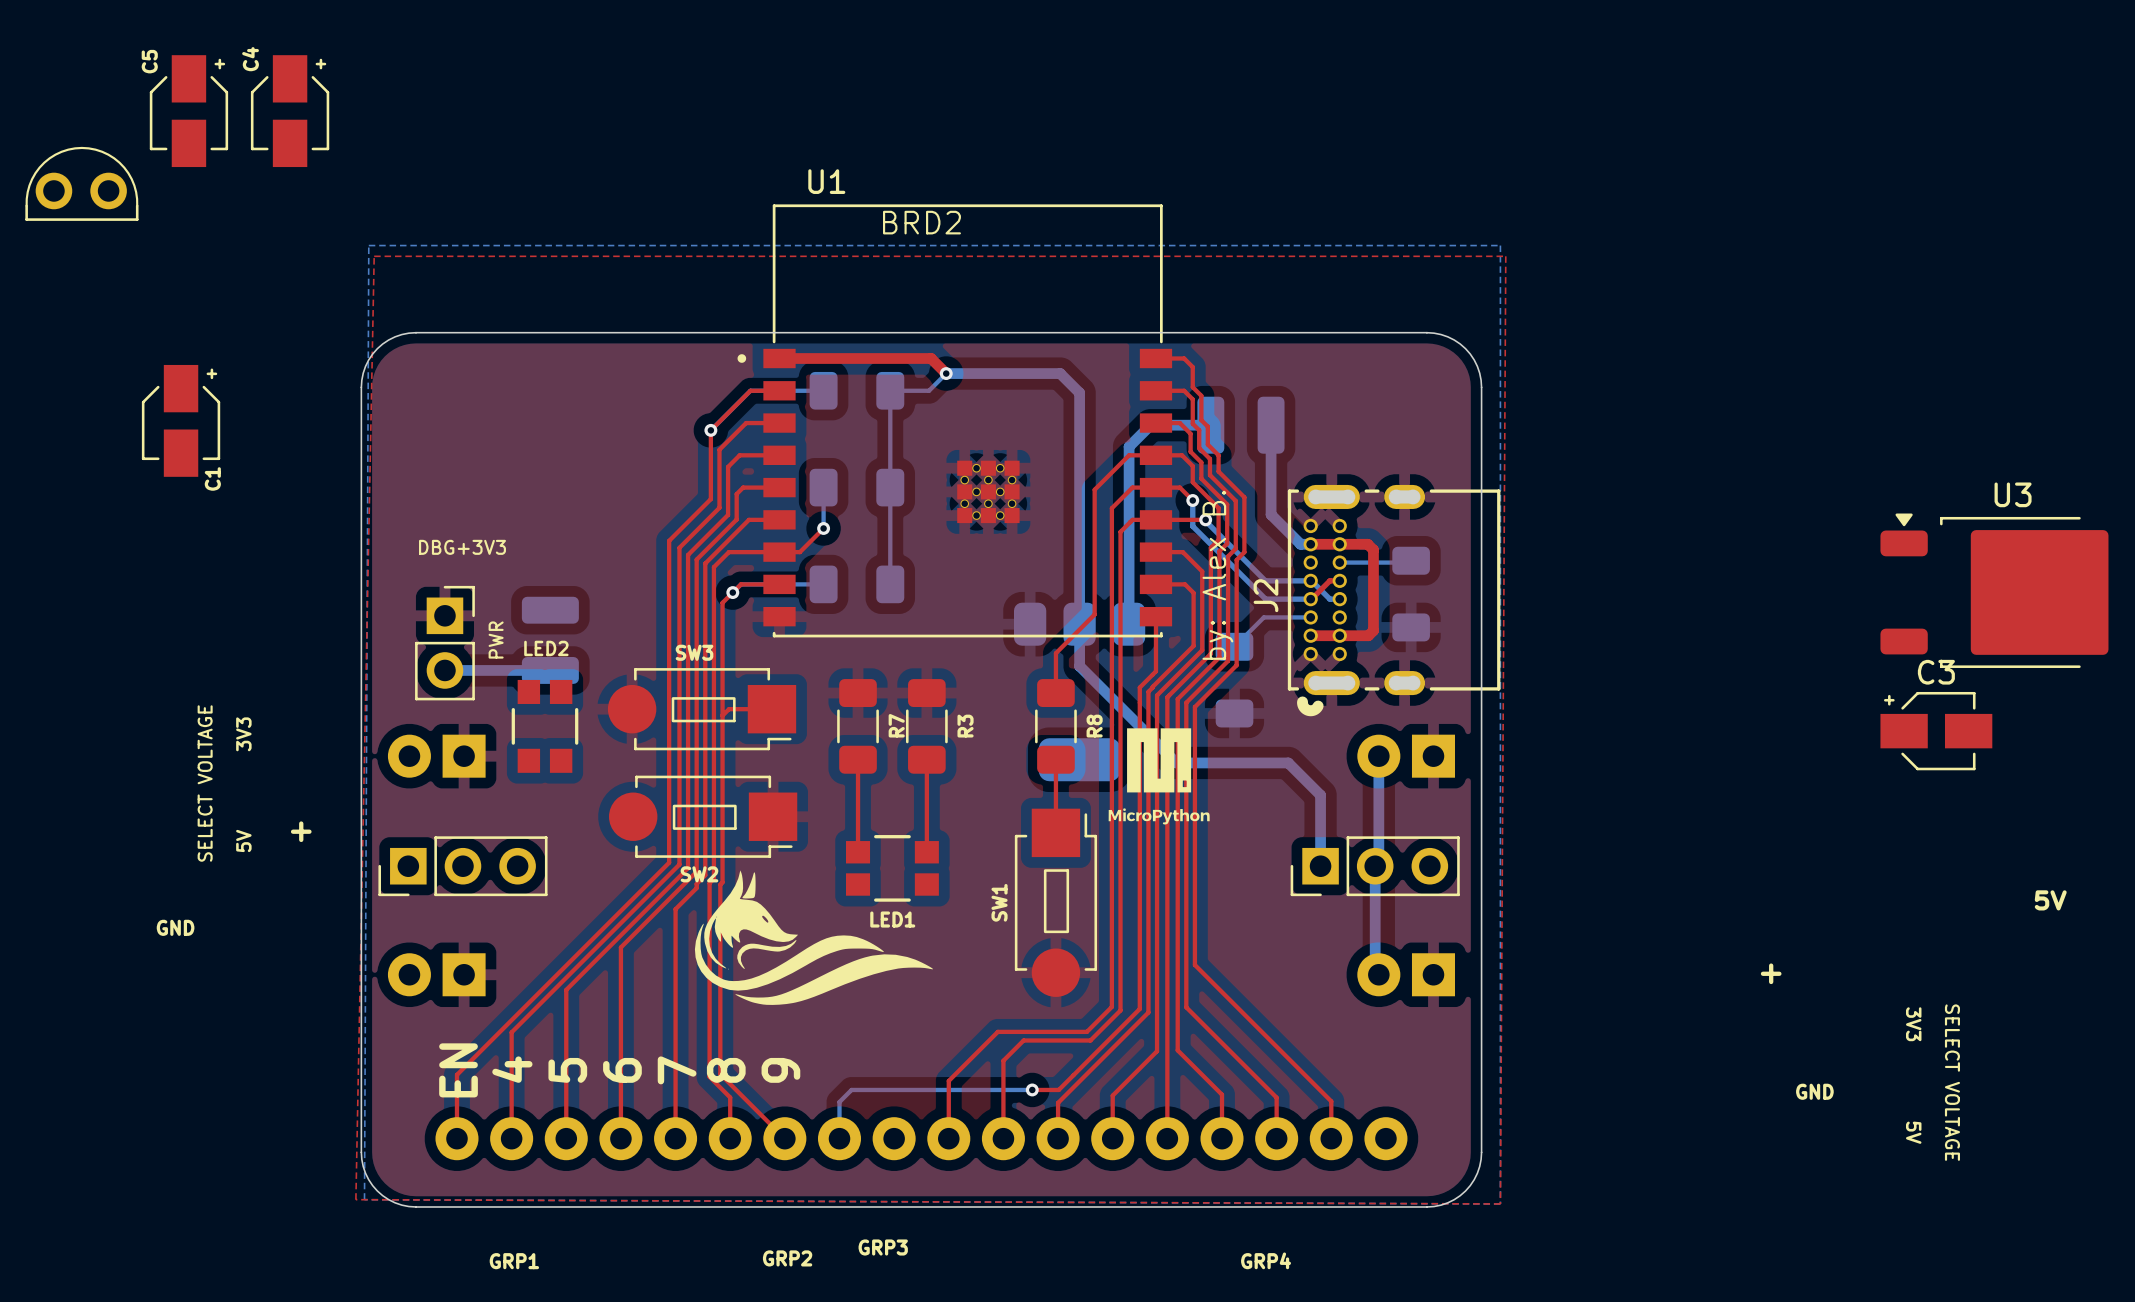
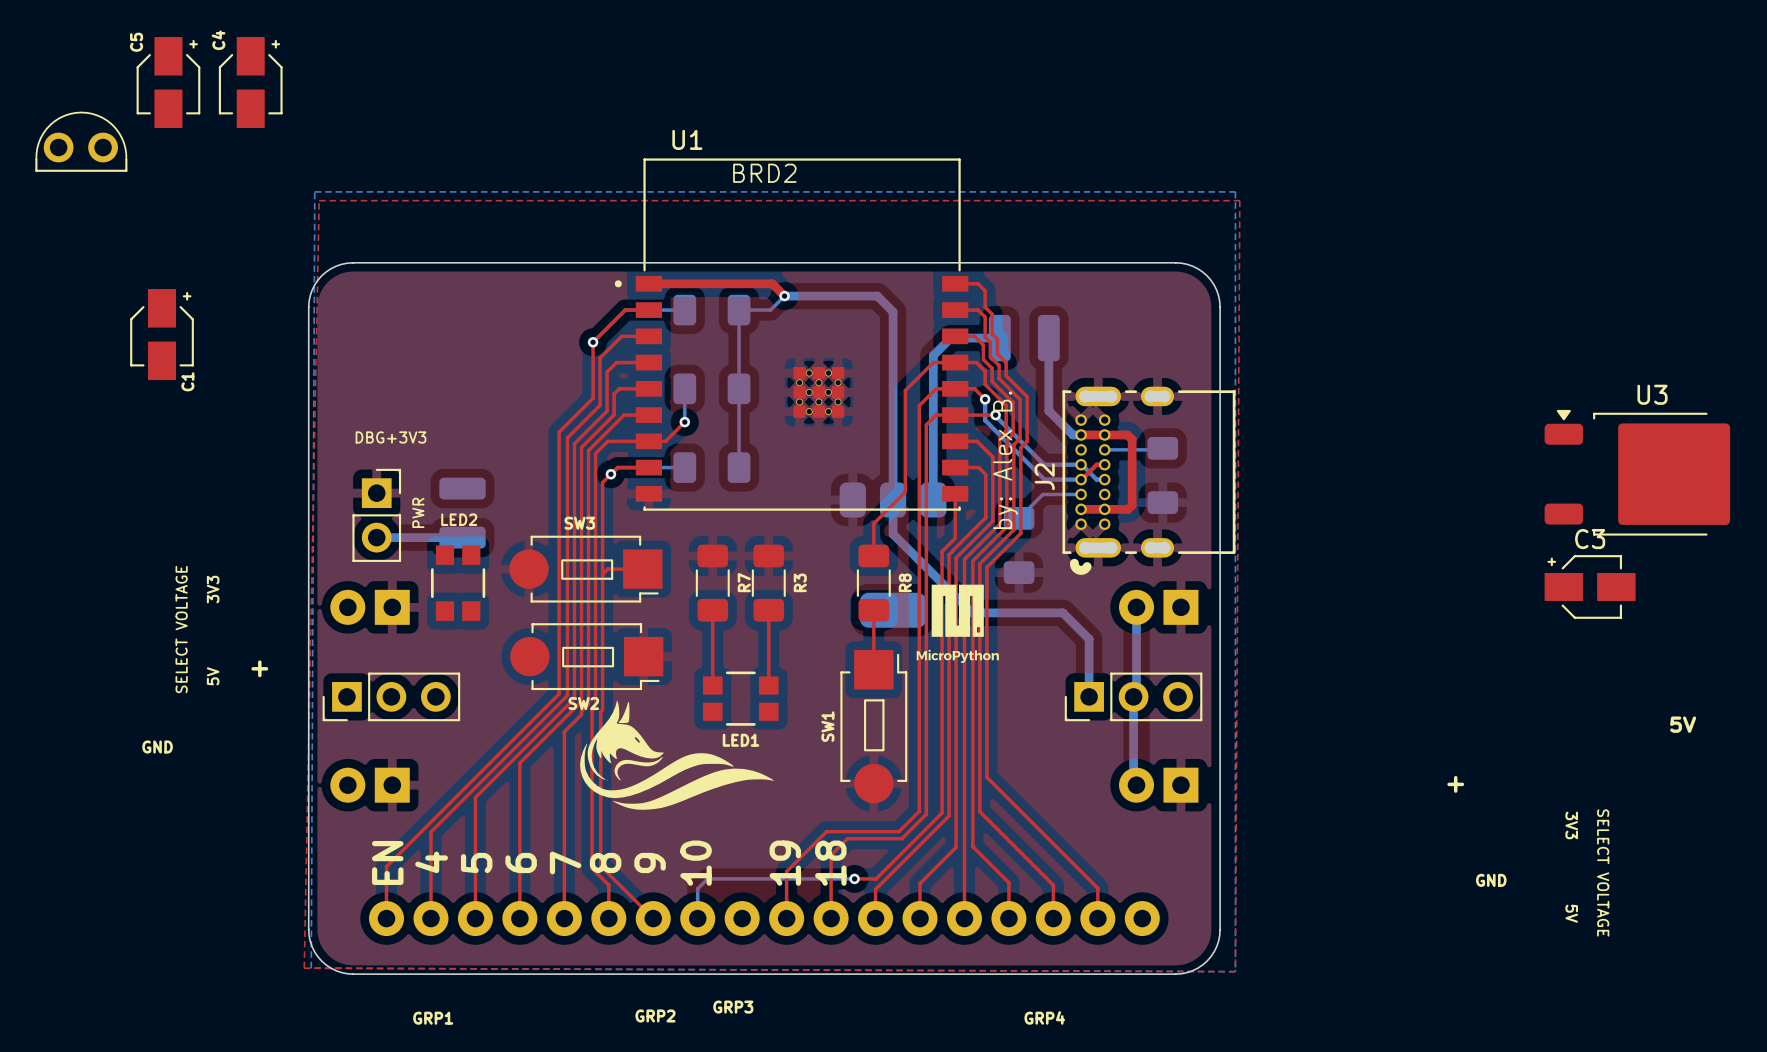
text: none -> 10 (696, 863)
text: none -> 19 (785, 863)
text: none -> 18 (830, 863)

